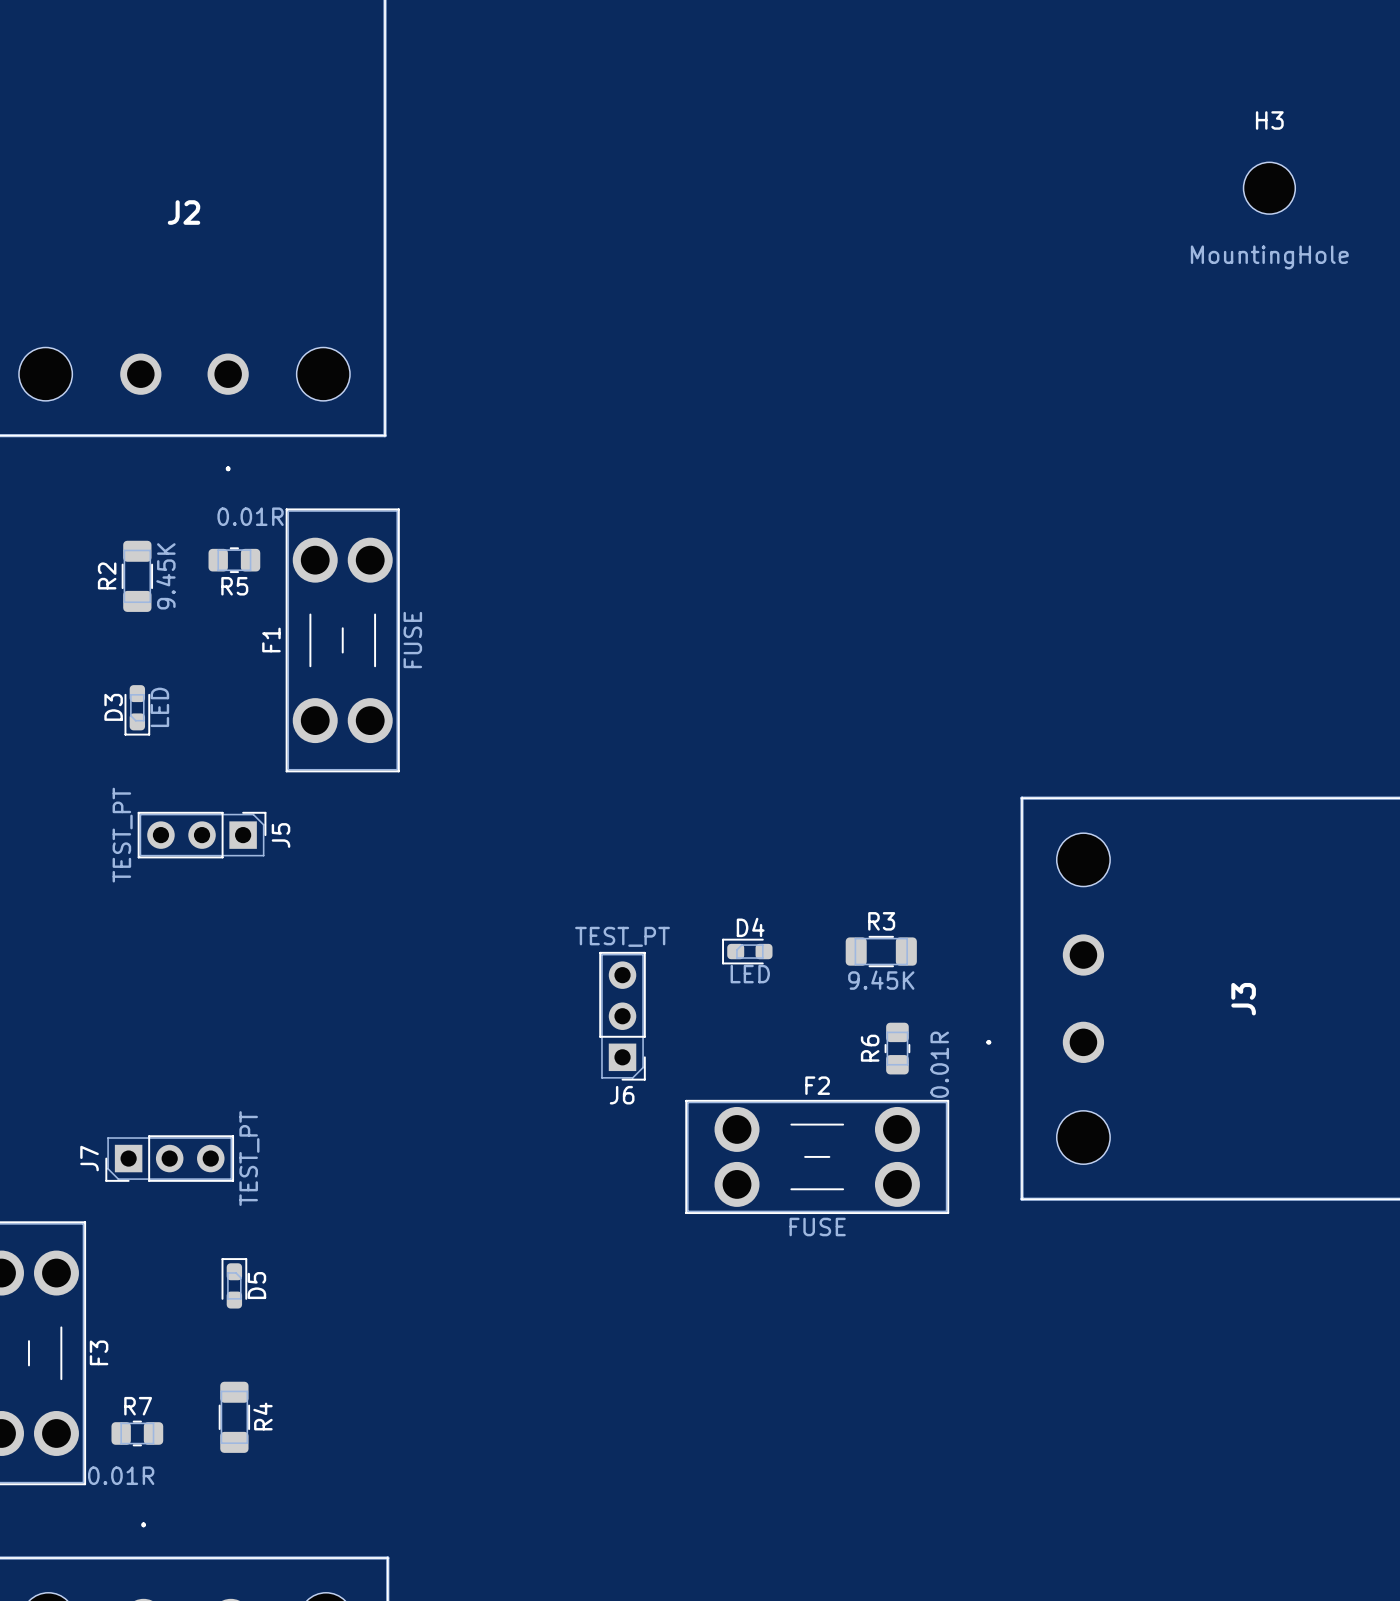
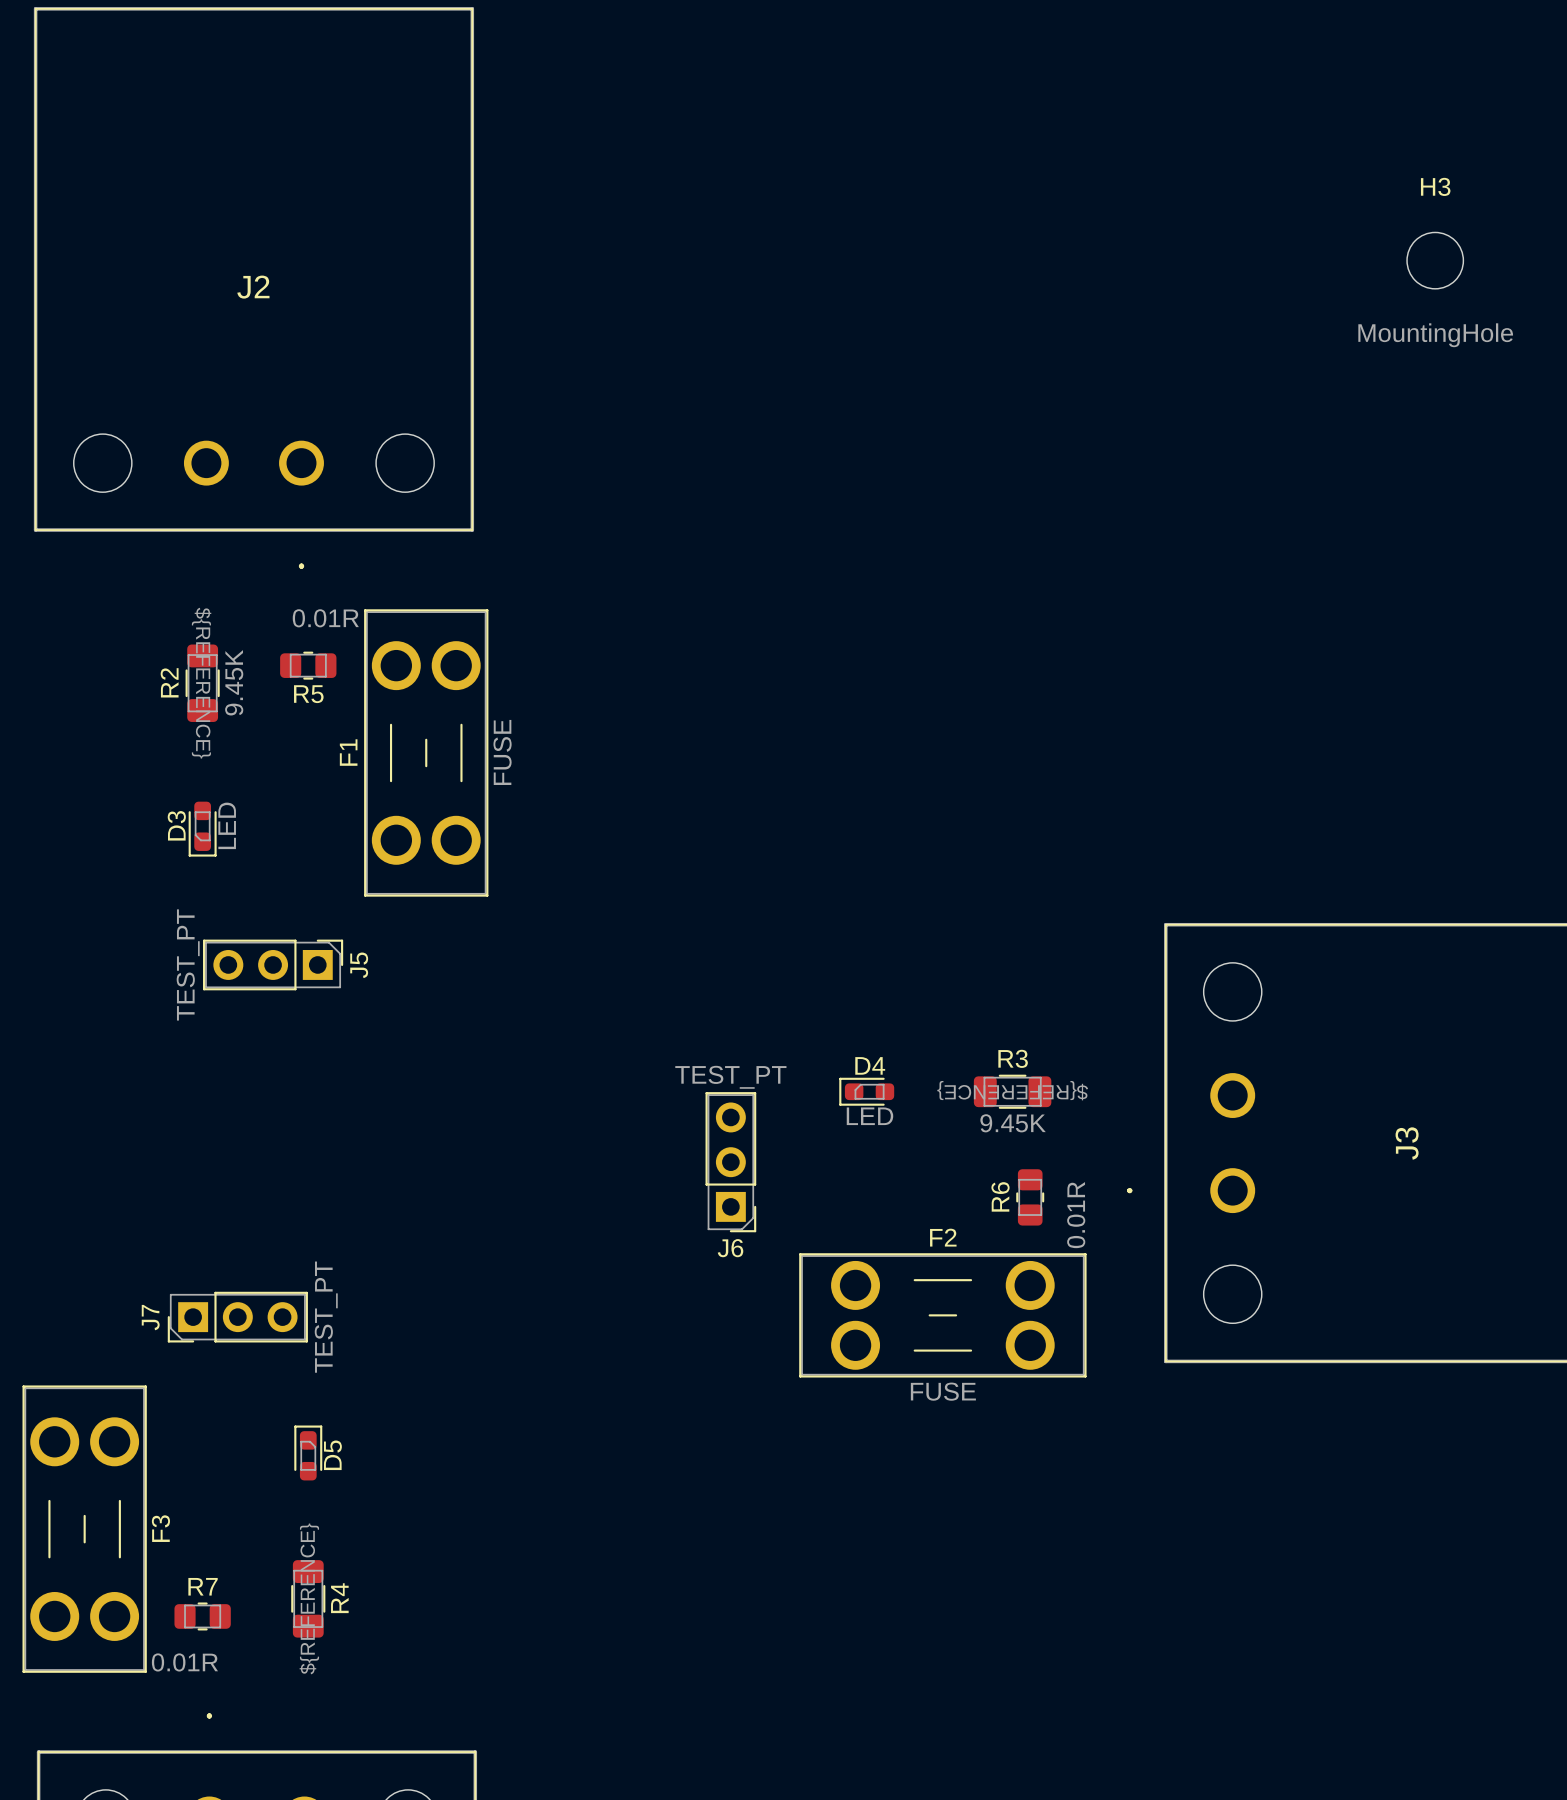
text: none -> ${REFERENCE} (201, 683)
text: none -> ${REFERENCE} (1012, 1090)
text: none -> ${REFERENCE} (309, 1598)

